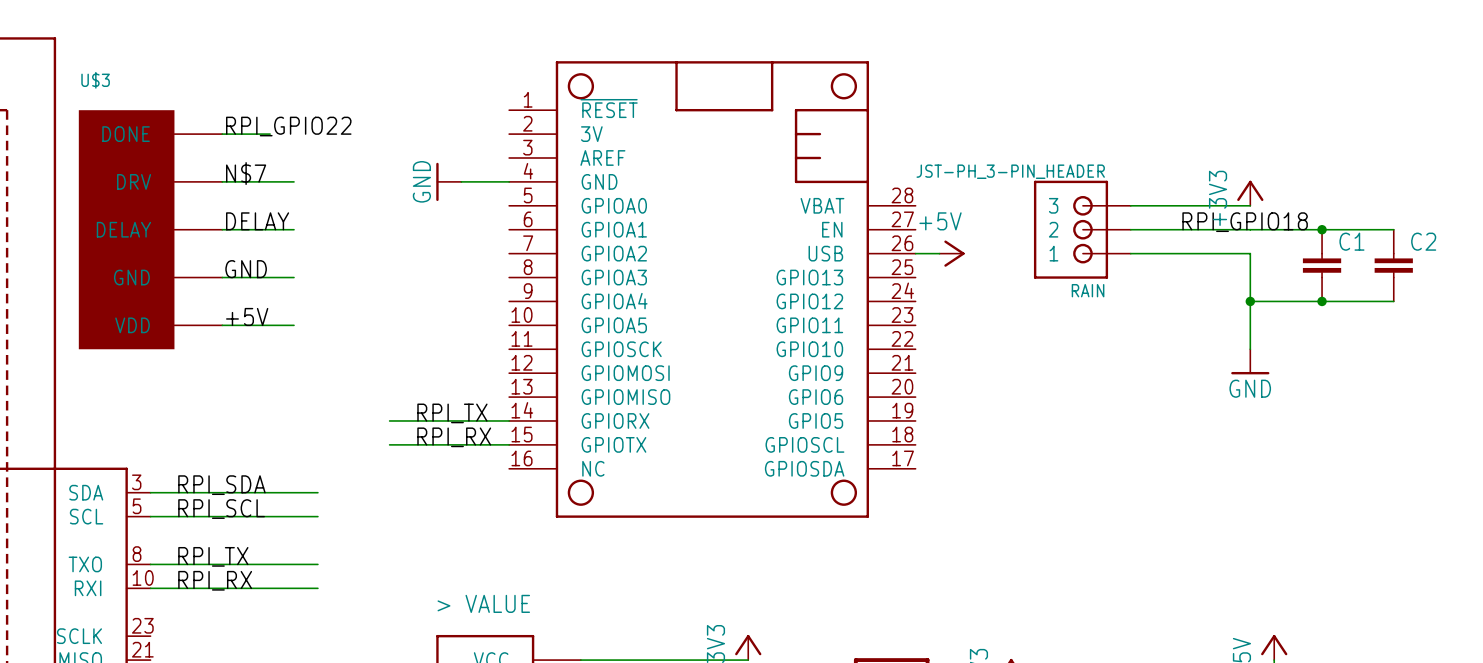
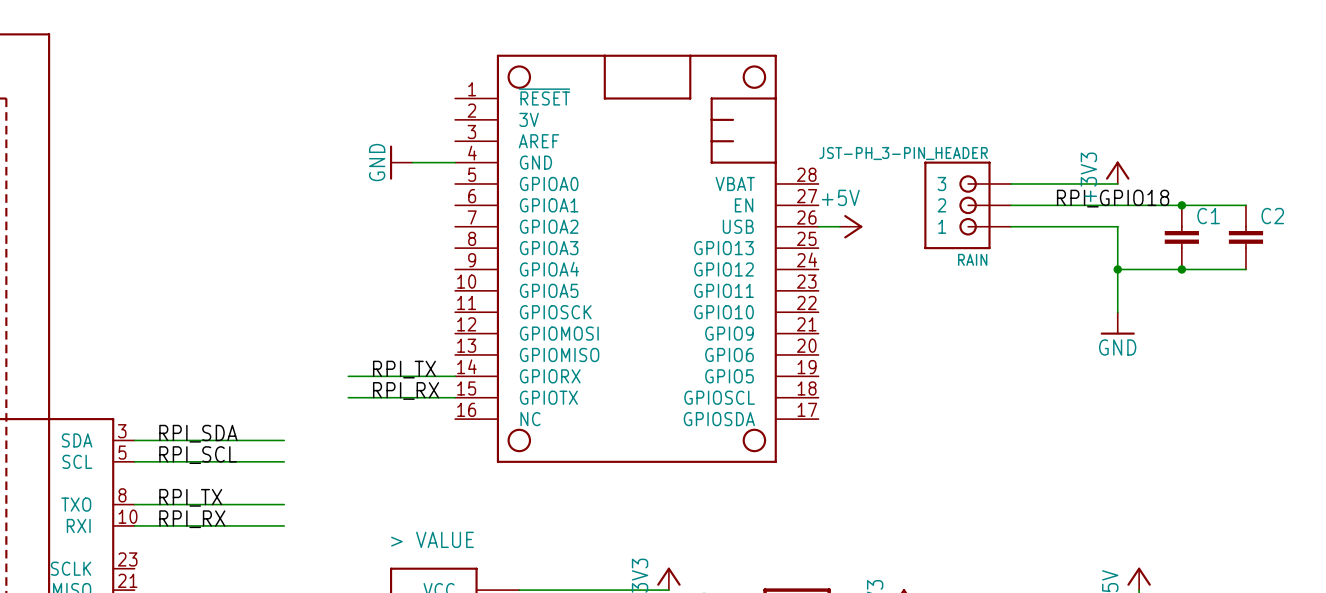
label: RPI_GPIO22 (288, 126) -> none
wire: (222, 134) (270, 134) -> none
label: N$7 (246, 173) -> none
wire: (222, 181) (293, 181) -> none
label: DELAY (257, 221) -> none
U$3: (150, 229) -> none
wire: (222, 229) (293, 229) -> none
label: GND (246, 269) -> none
wire: (222, 277) (293, 277) -> none
label: +5V (247, 316) -> none
wire: (222, 325) (293, 325) -> none

